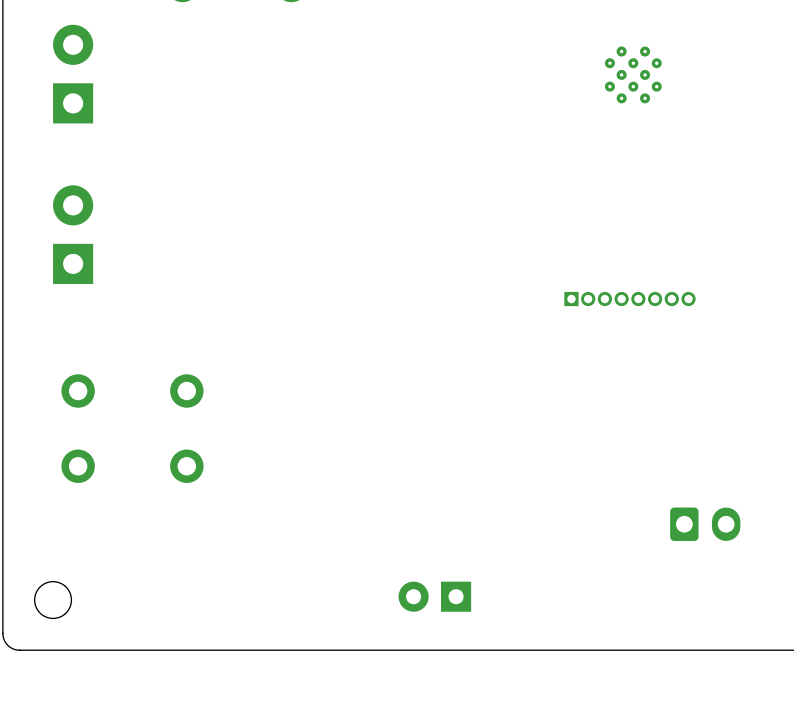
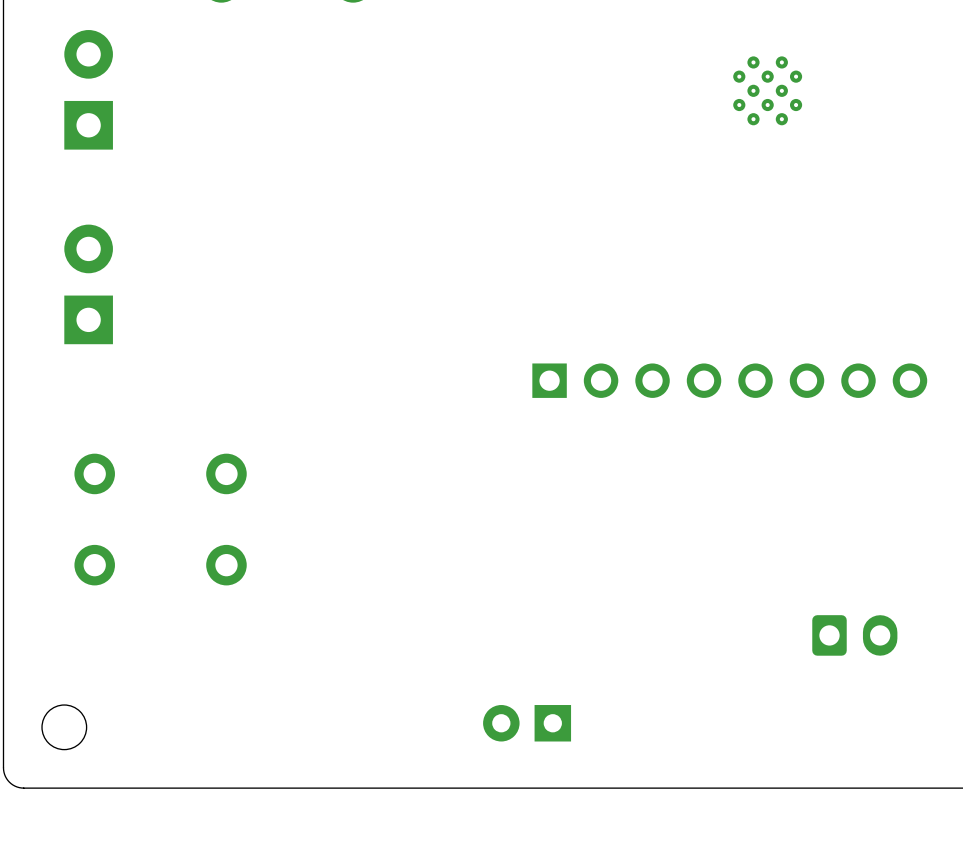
part: (630, 299) -> none
part: none -> (729, 380)

